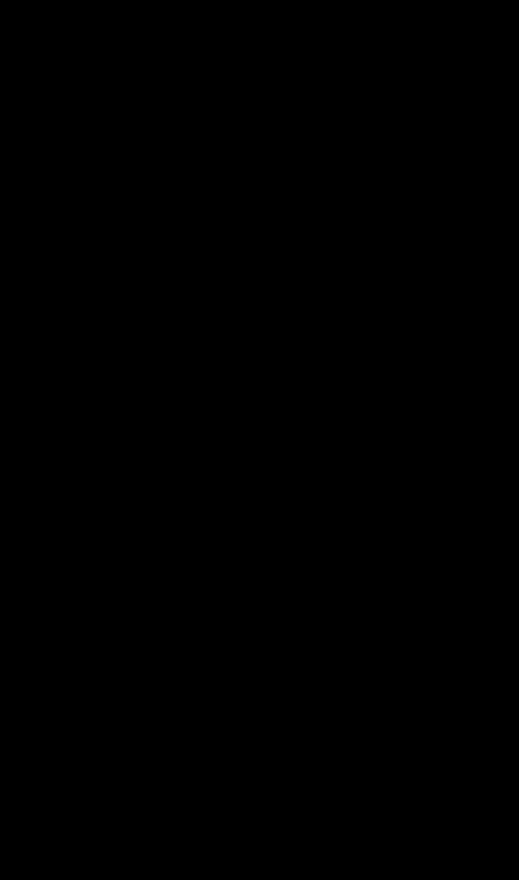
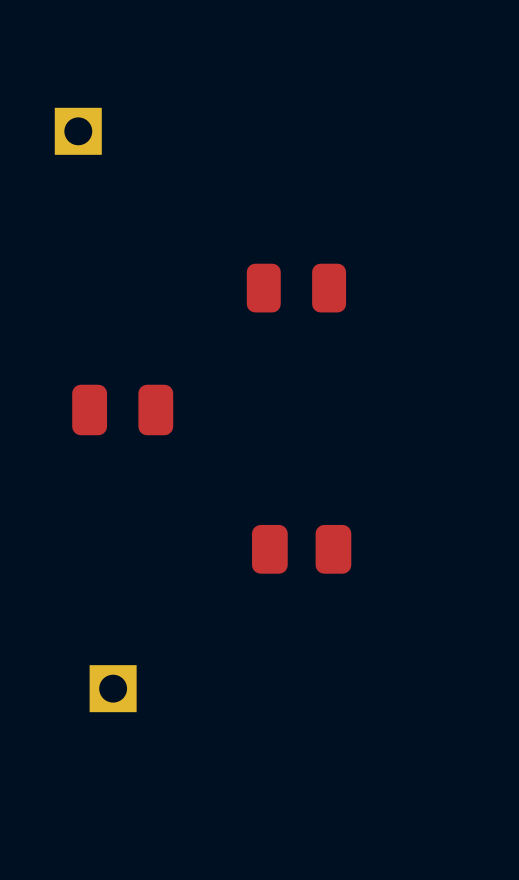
part: none -> (78, 131)
part: none -> (296, 288)
part: none -> (122, 409)
part: none -> (301, 549)
part: none -> (113, 688)

